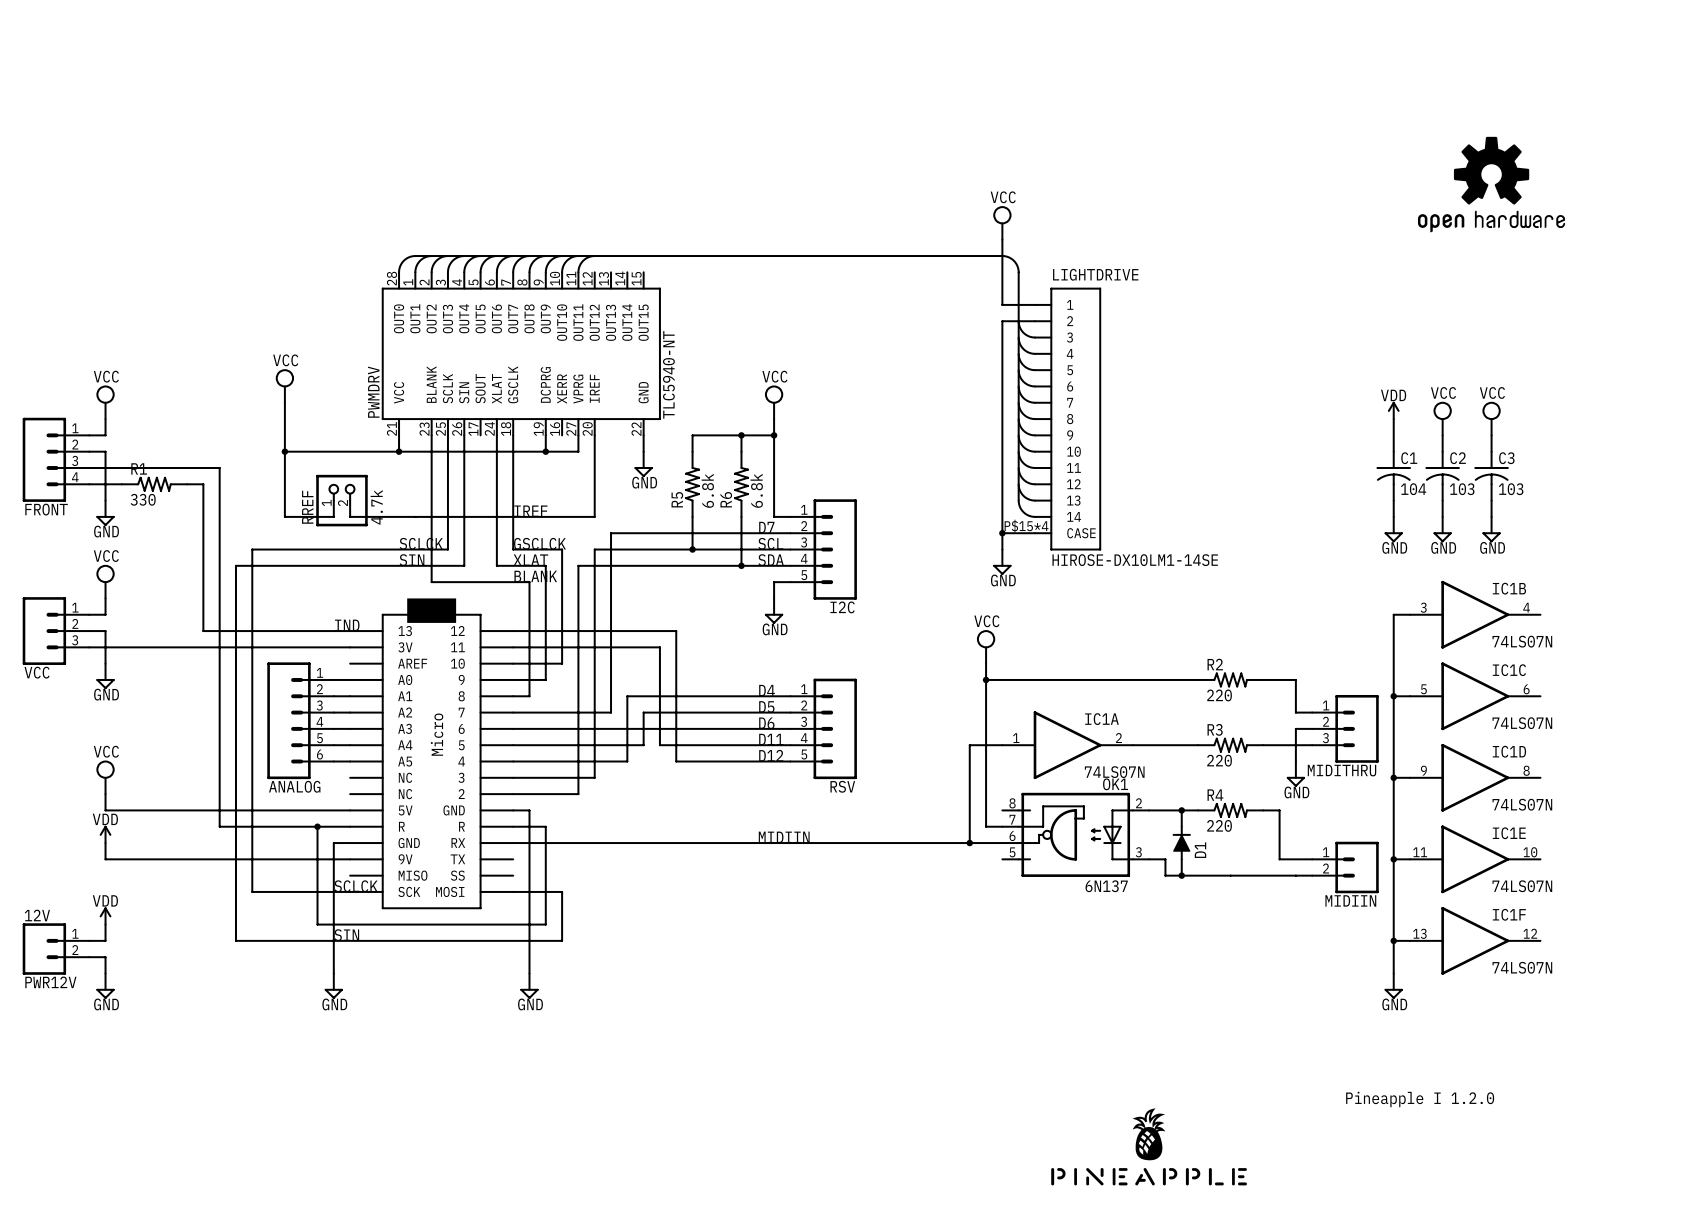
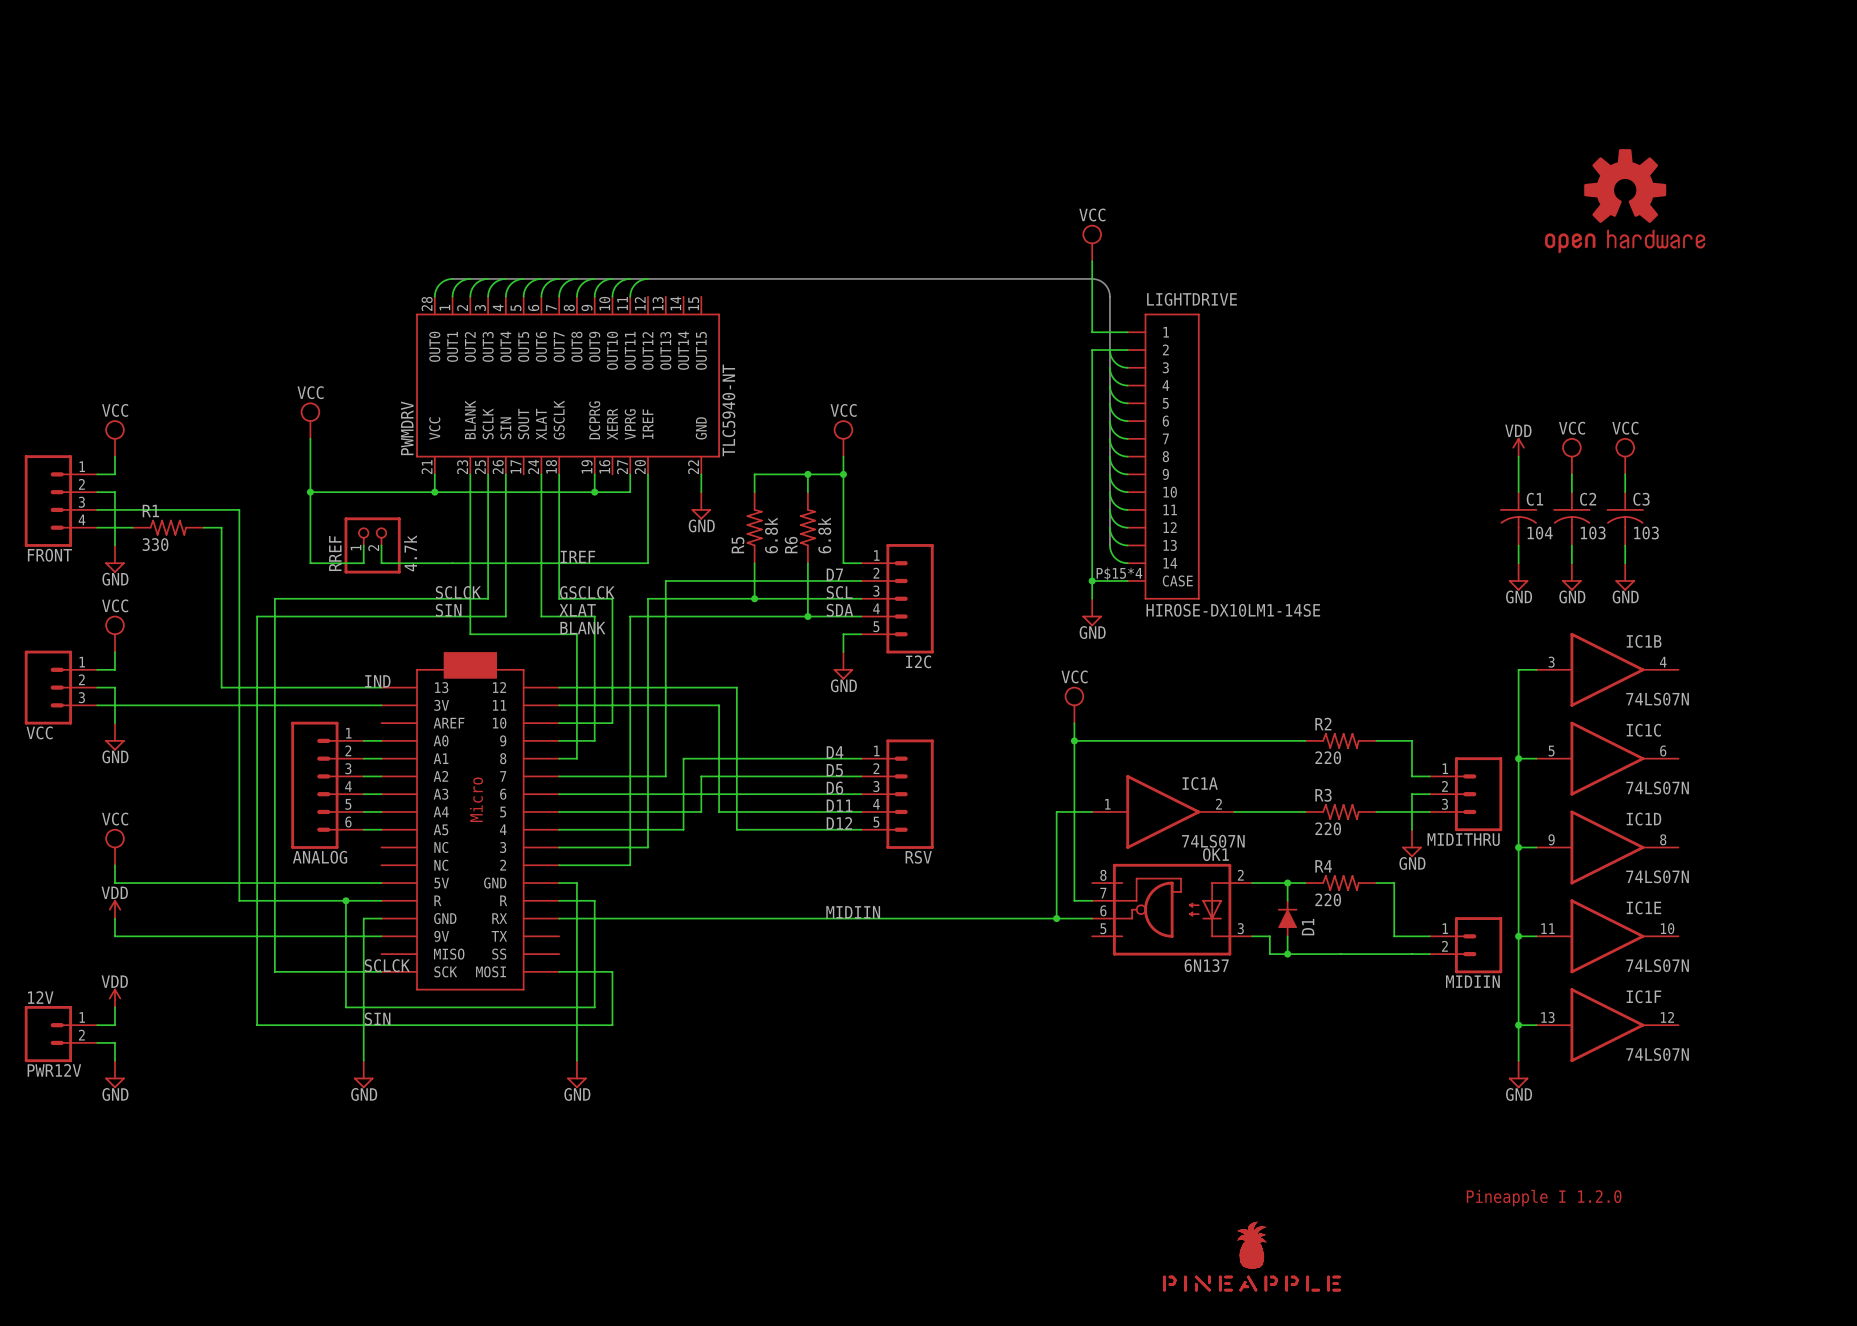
part: (1149, 1146) -> none
part: none -> (1252, 1256)

